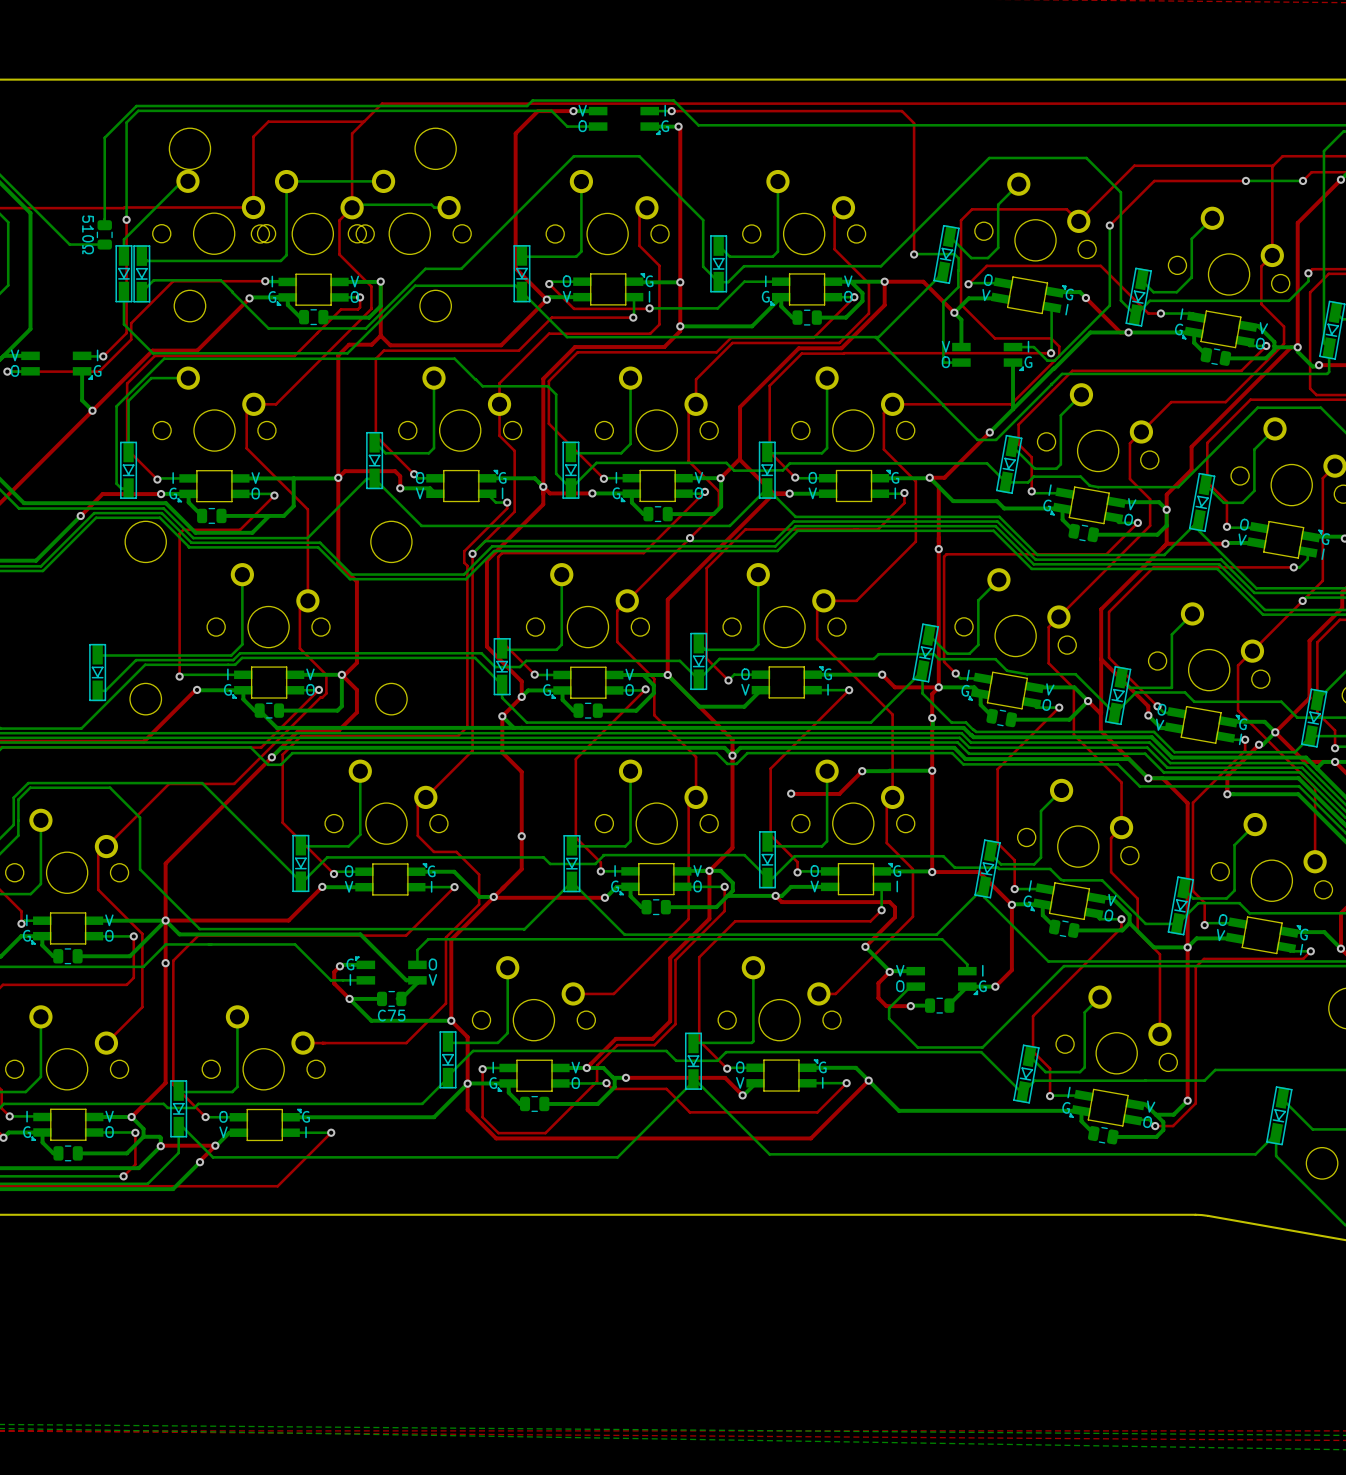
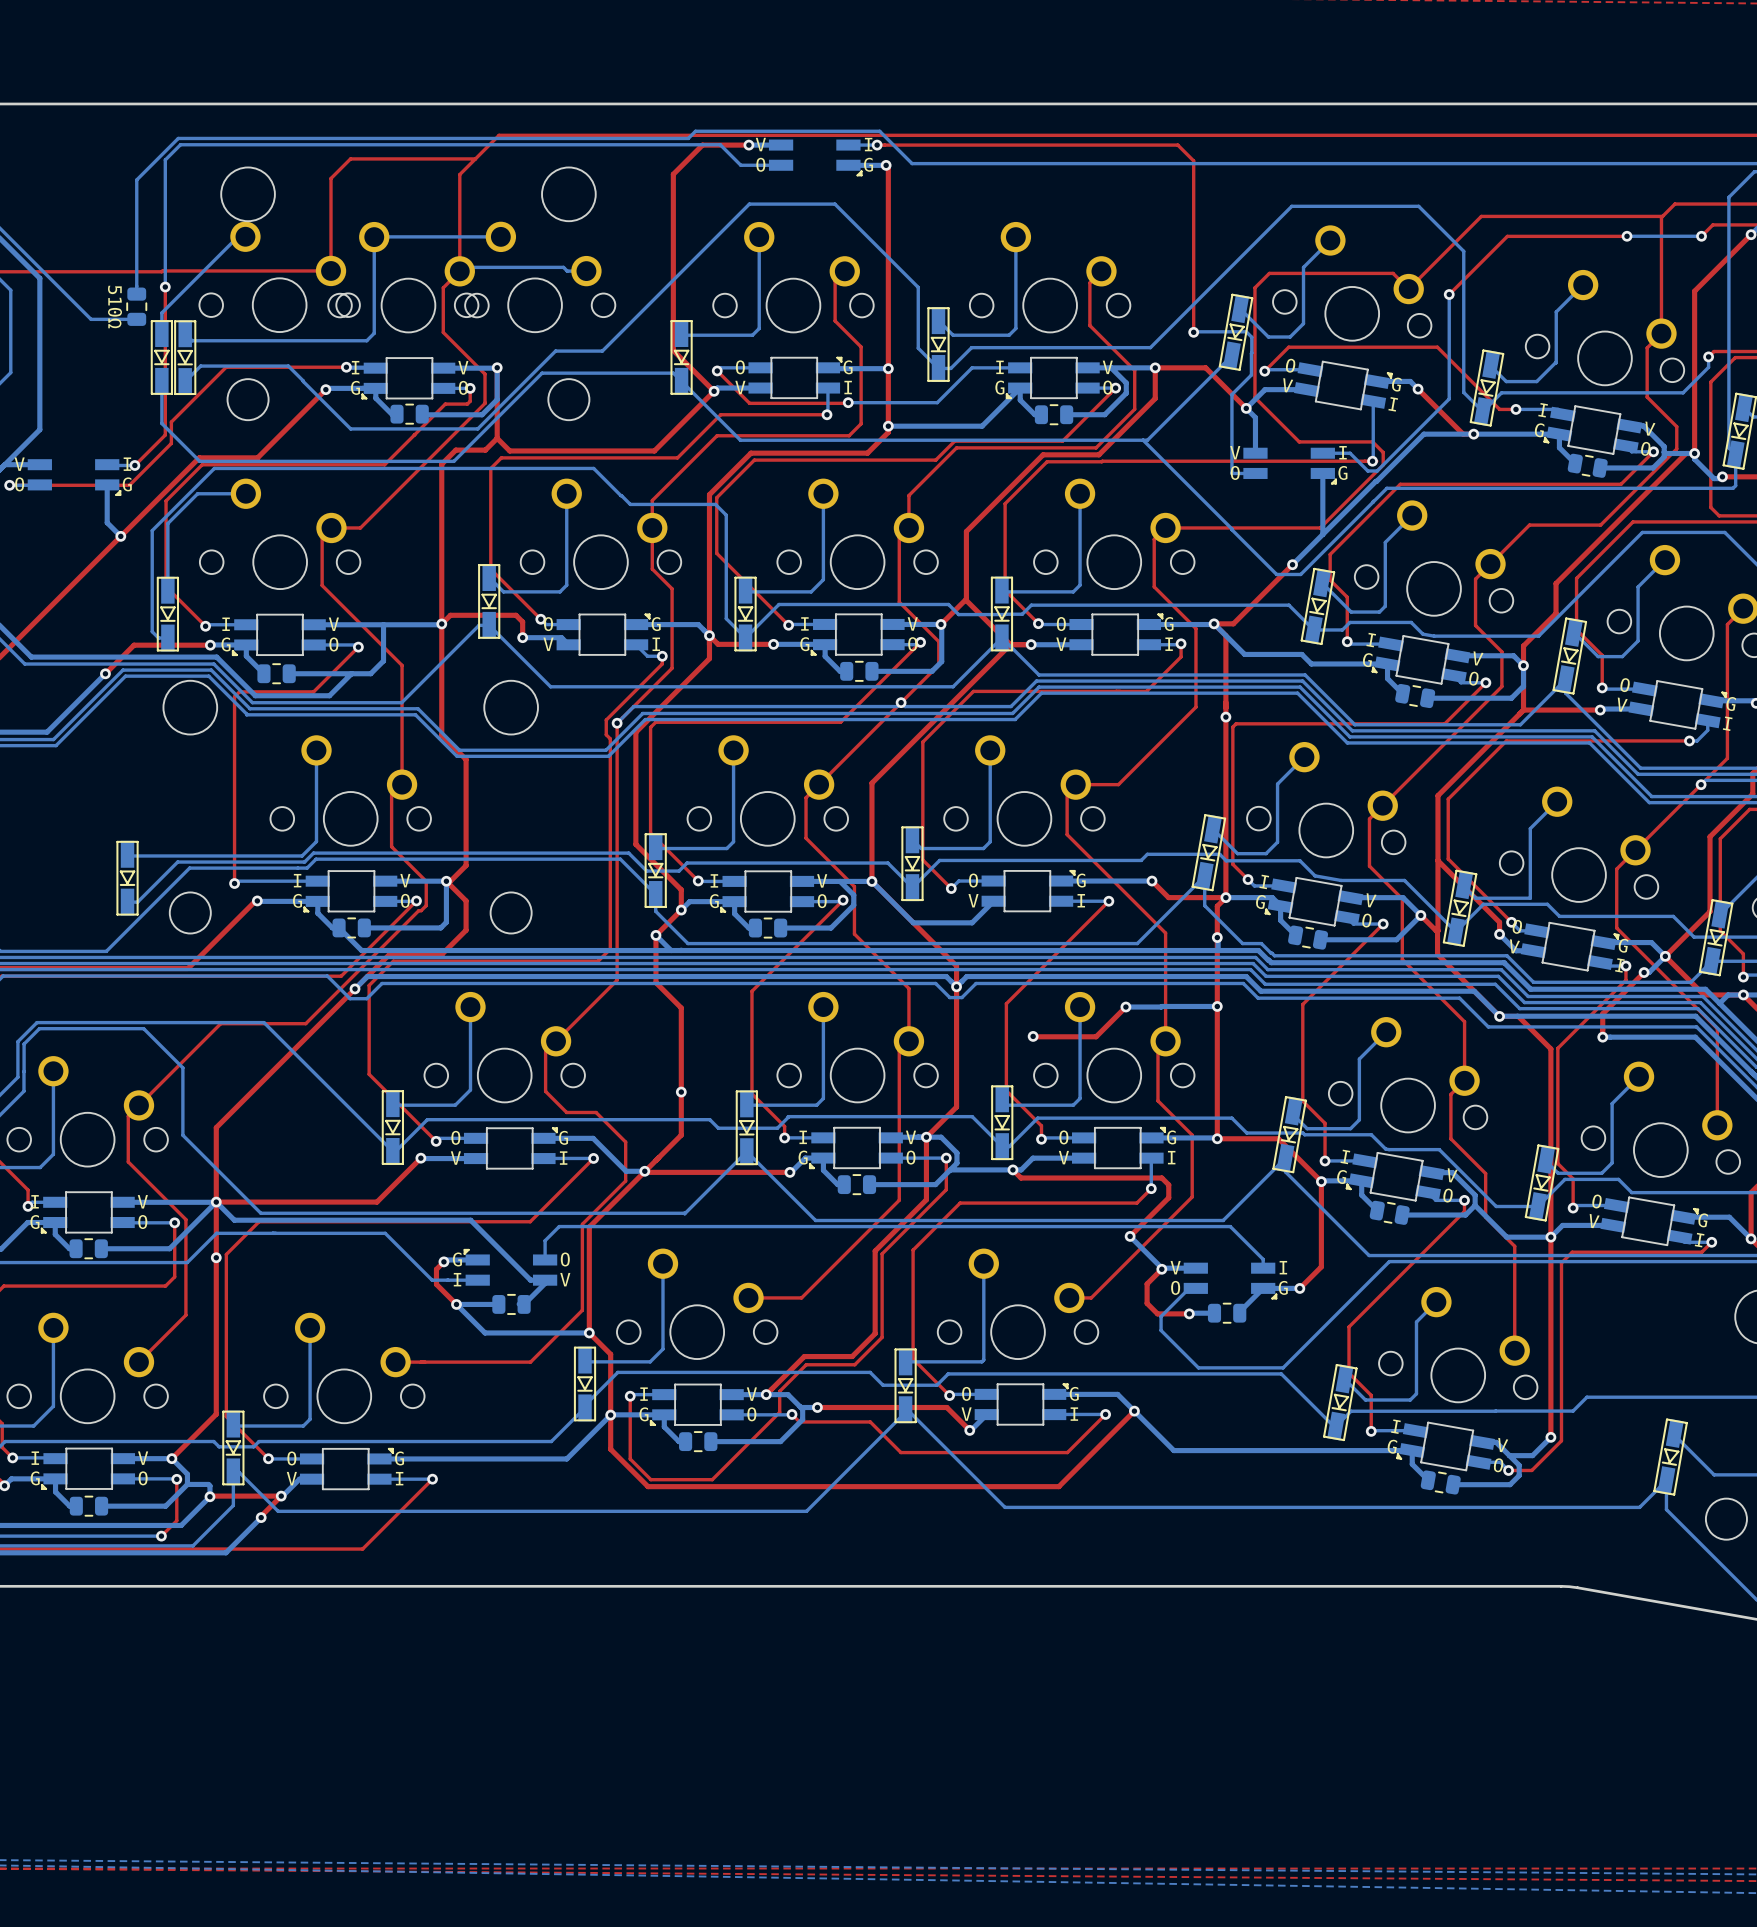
C75 name: C75 (391, 1015) -> none

